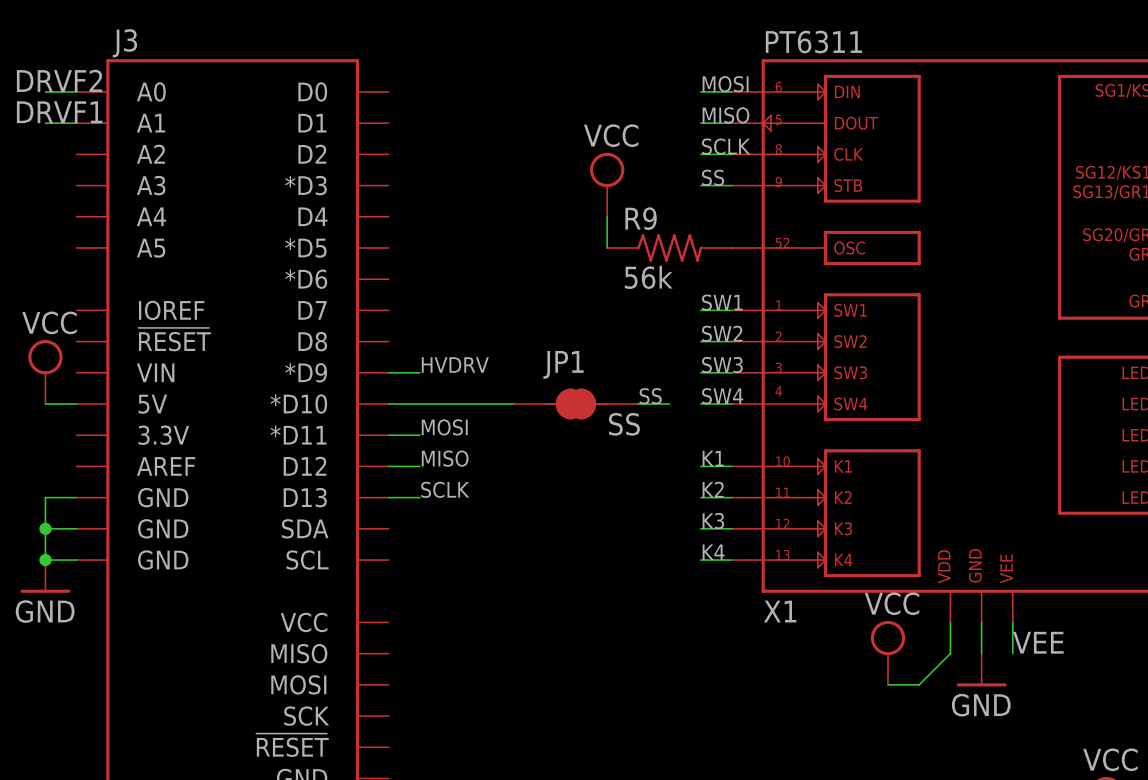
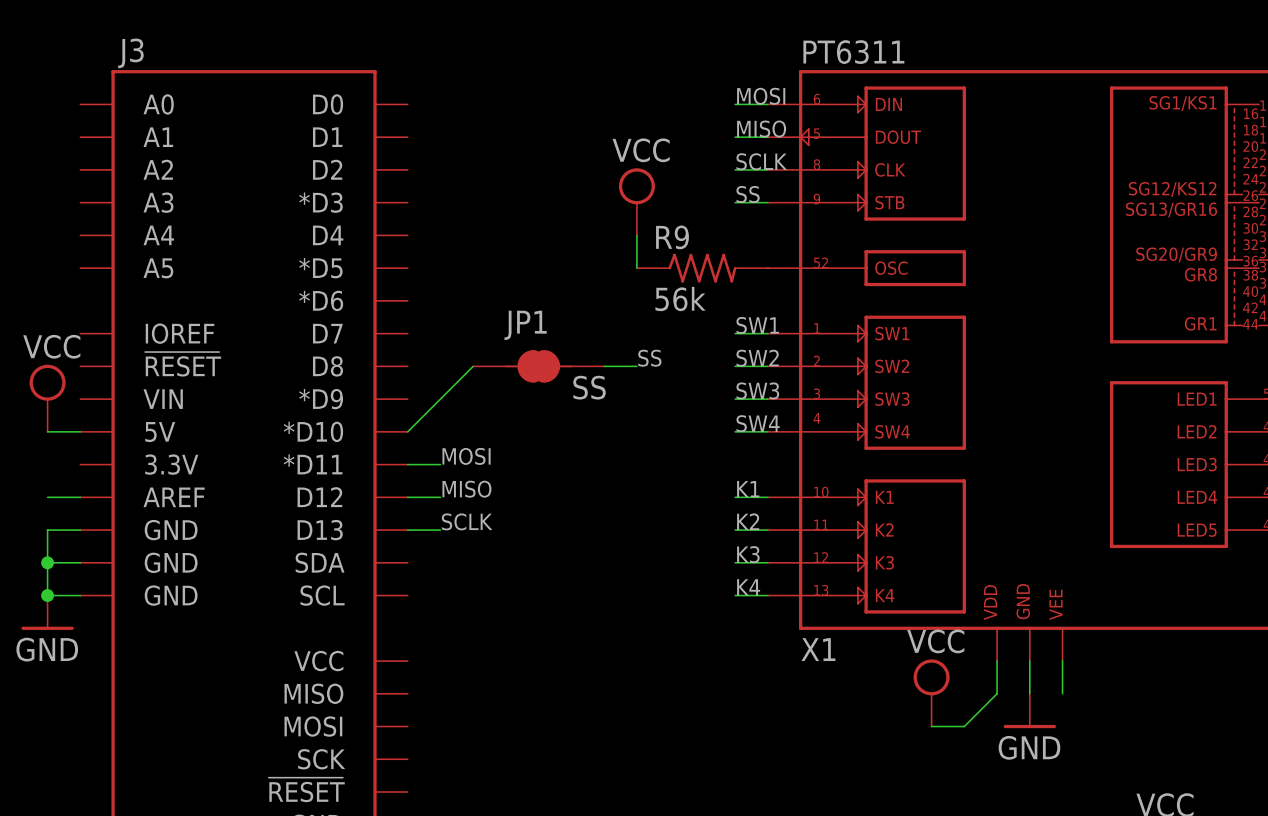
label: DRVF2 (59, 80) -> none
wire: (45, 91) (76, 91) -> none
label: DRVF1 (59, 112) -> none
wire: (45, 123) (76, 123) -> none
label: HVDRV (455, 365) -> none
wire: (388, 372) (419, 372) -> none
label position: SS (650, 396) -> SS (649, 358)
wire: (388, 404) (513, 404) -> (407, 431) (473, 366)
JP1 position: (575, 404) -> (538, 366)
wire: (638, 404) (669, 404) -> (604, 366) (636, 366)
wire: none -> (47, 497) (80, 497)
label: VEE (1038, 642) -> none

